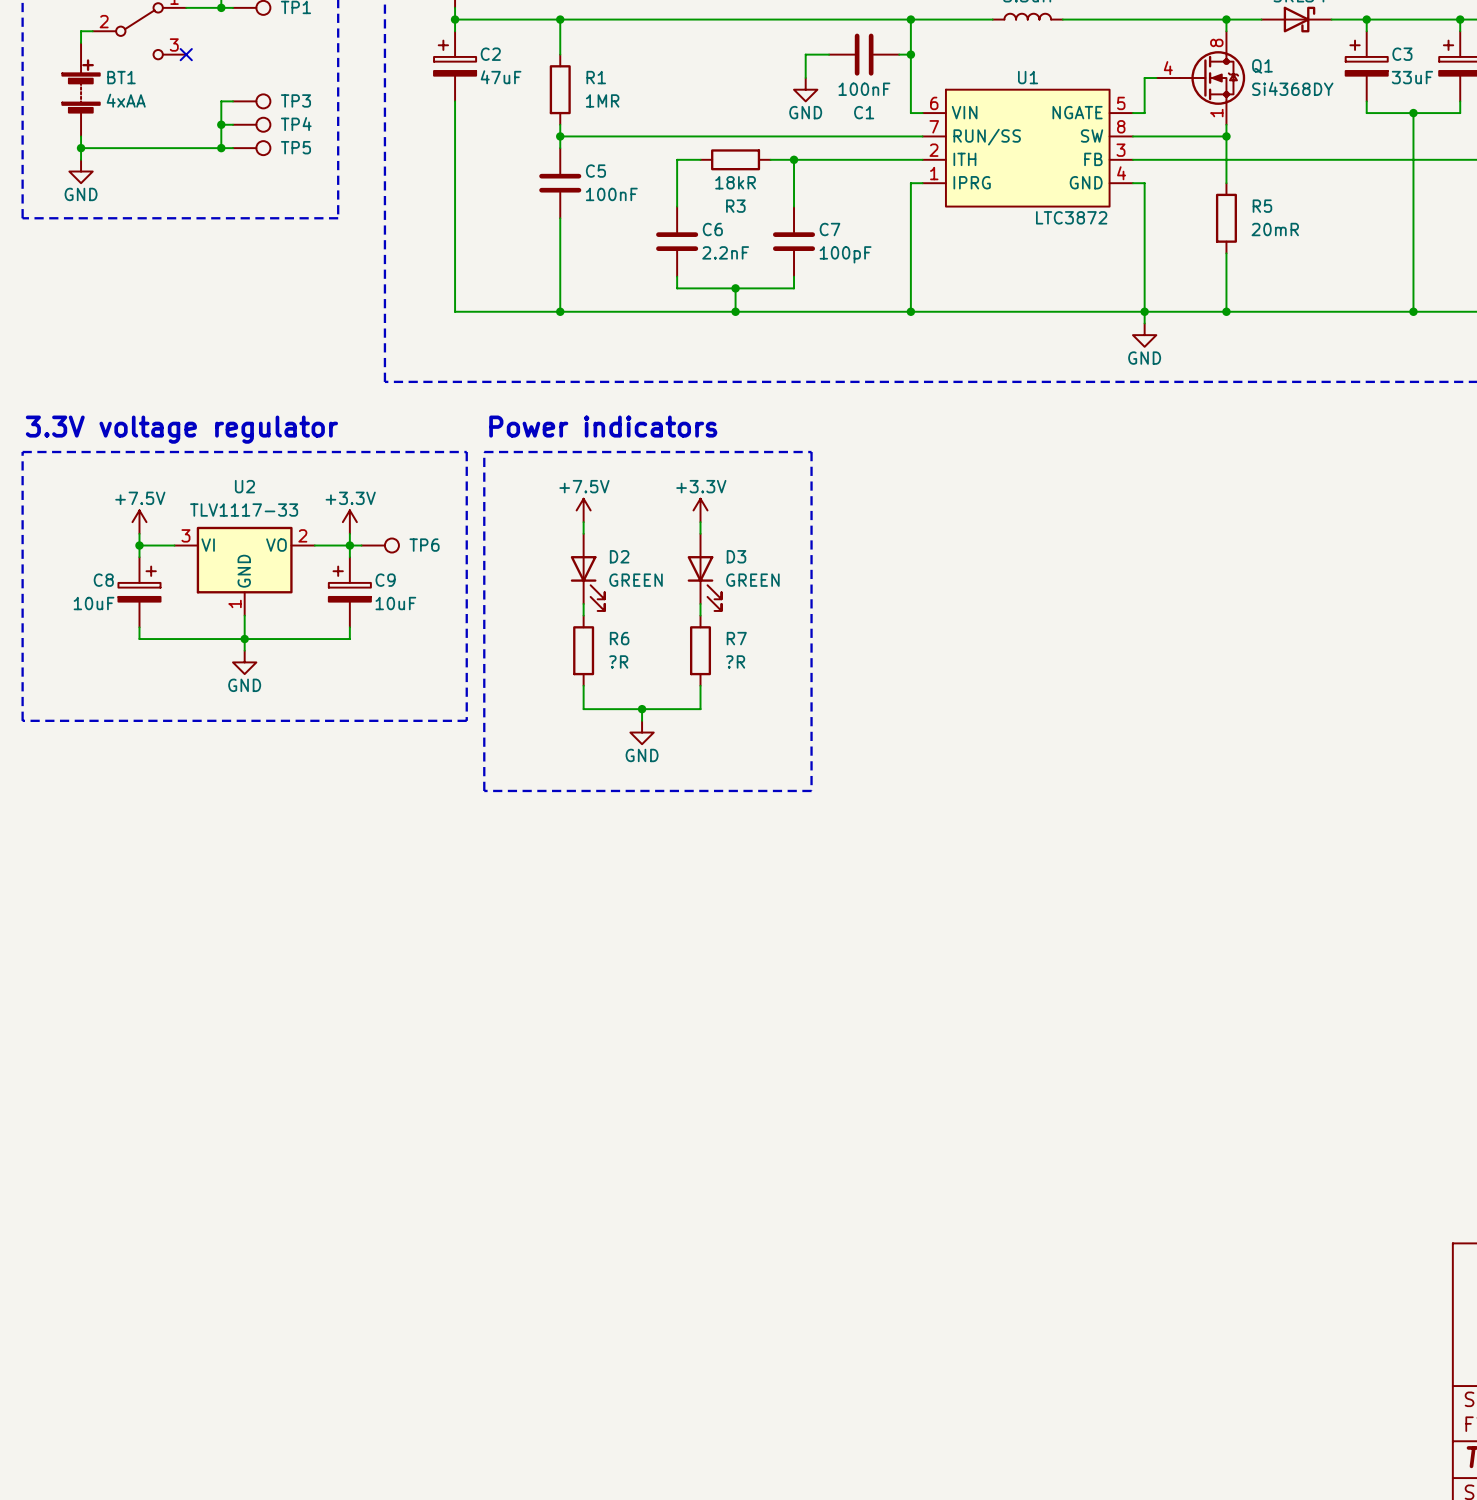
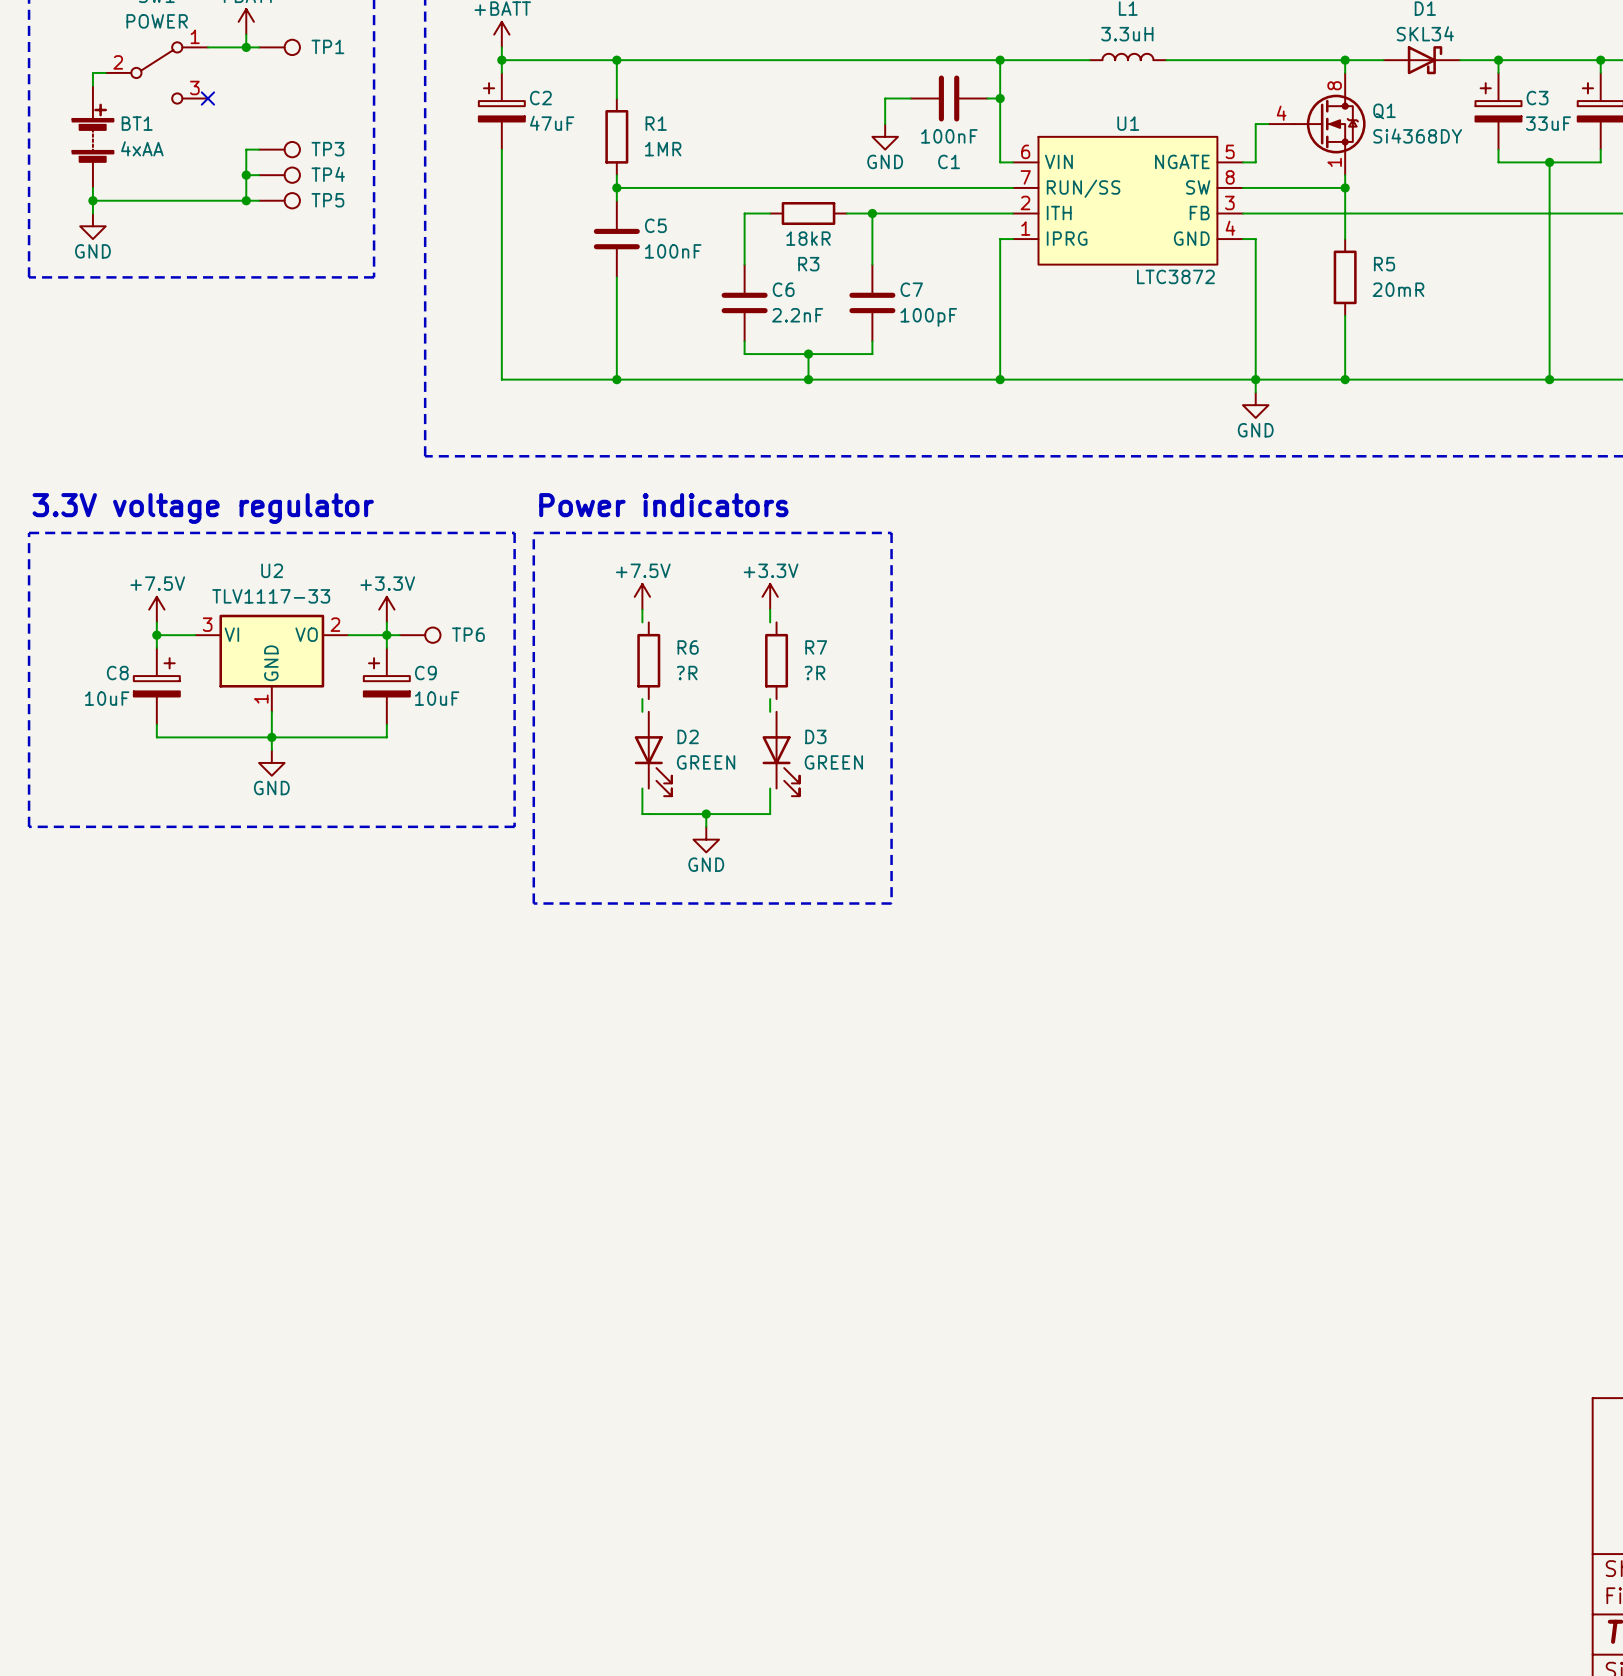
D2 position: (587, 572) -> (653, 754)
D3 position: (704, 572) -> (781, 754)
R6 position: (583, 650) -> (648, 660)
R7 position: (700, 650) -> (776, 660)

